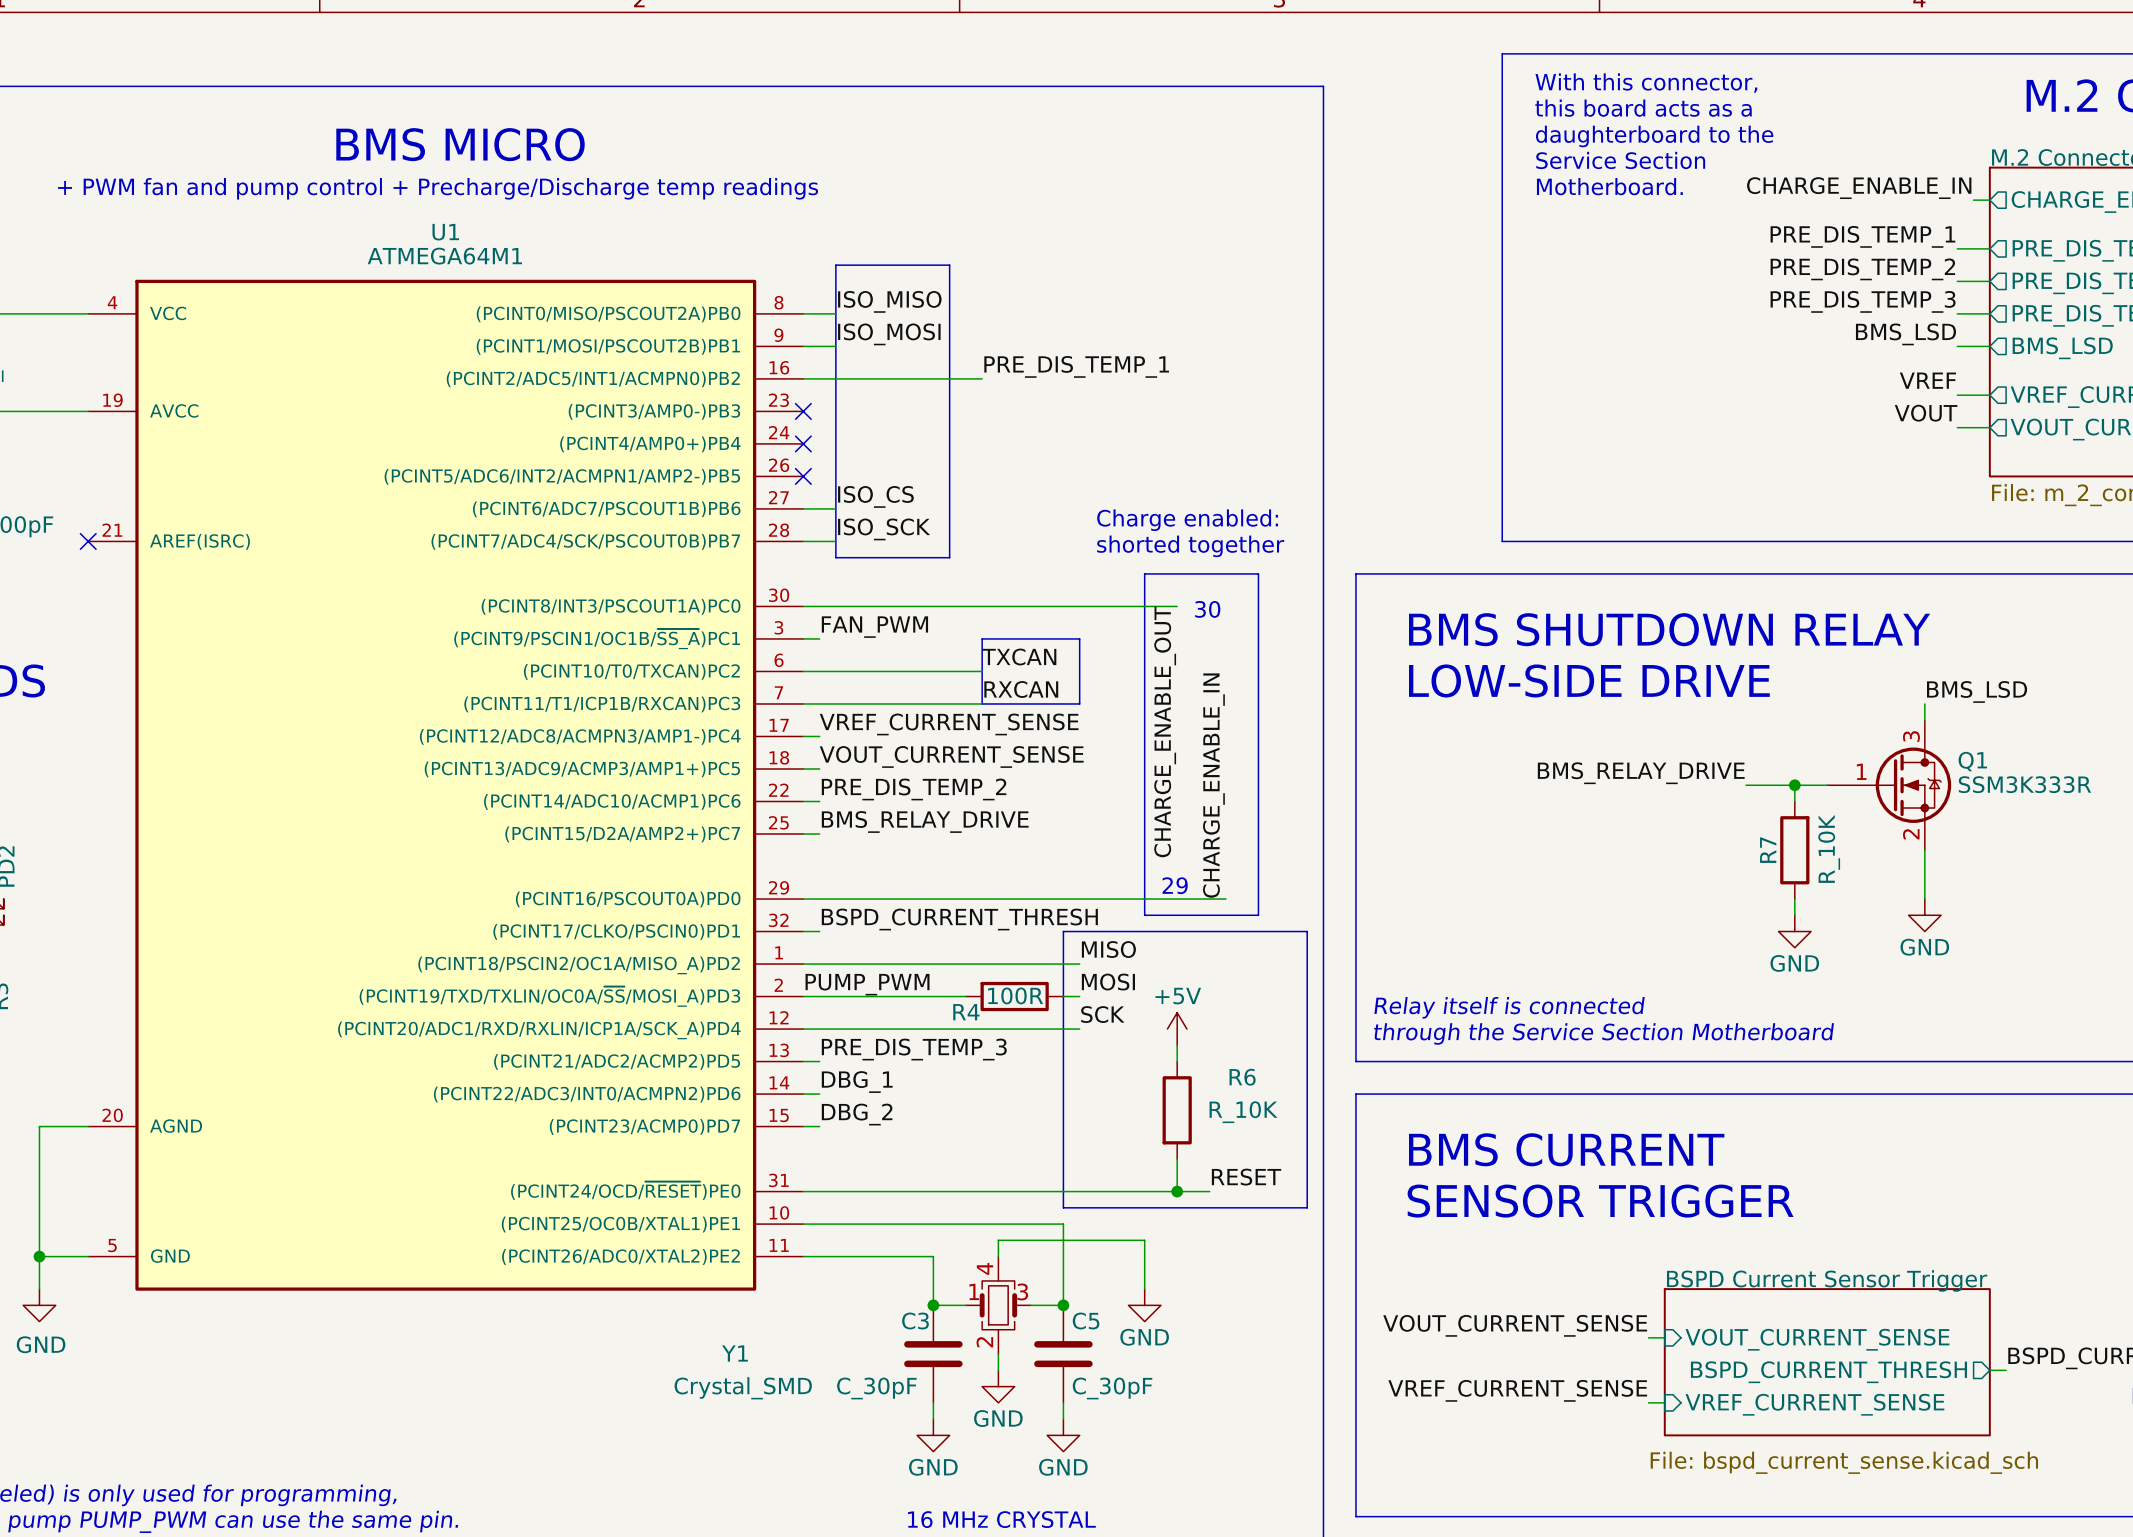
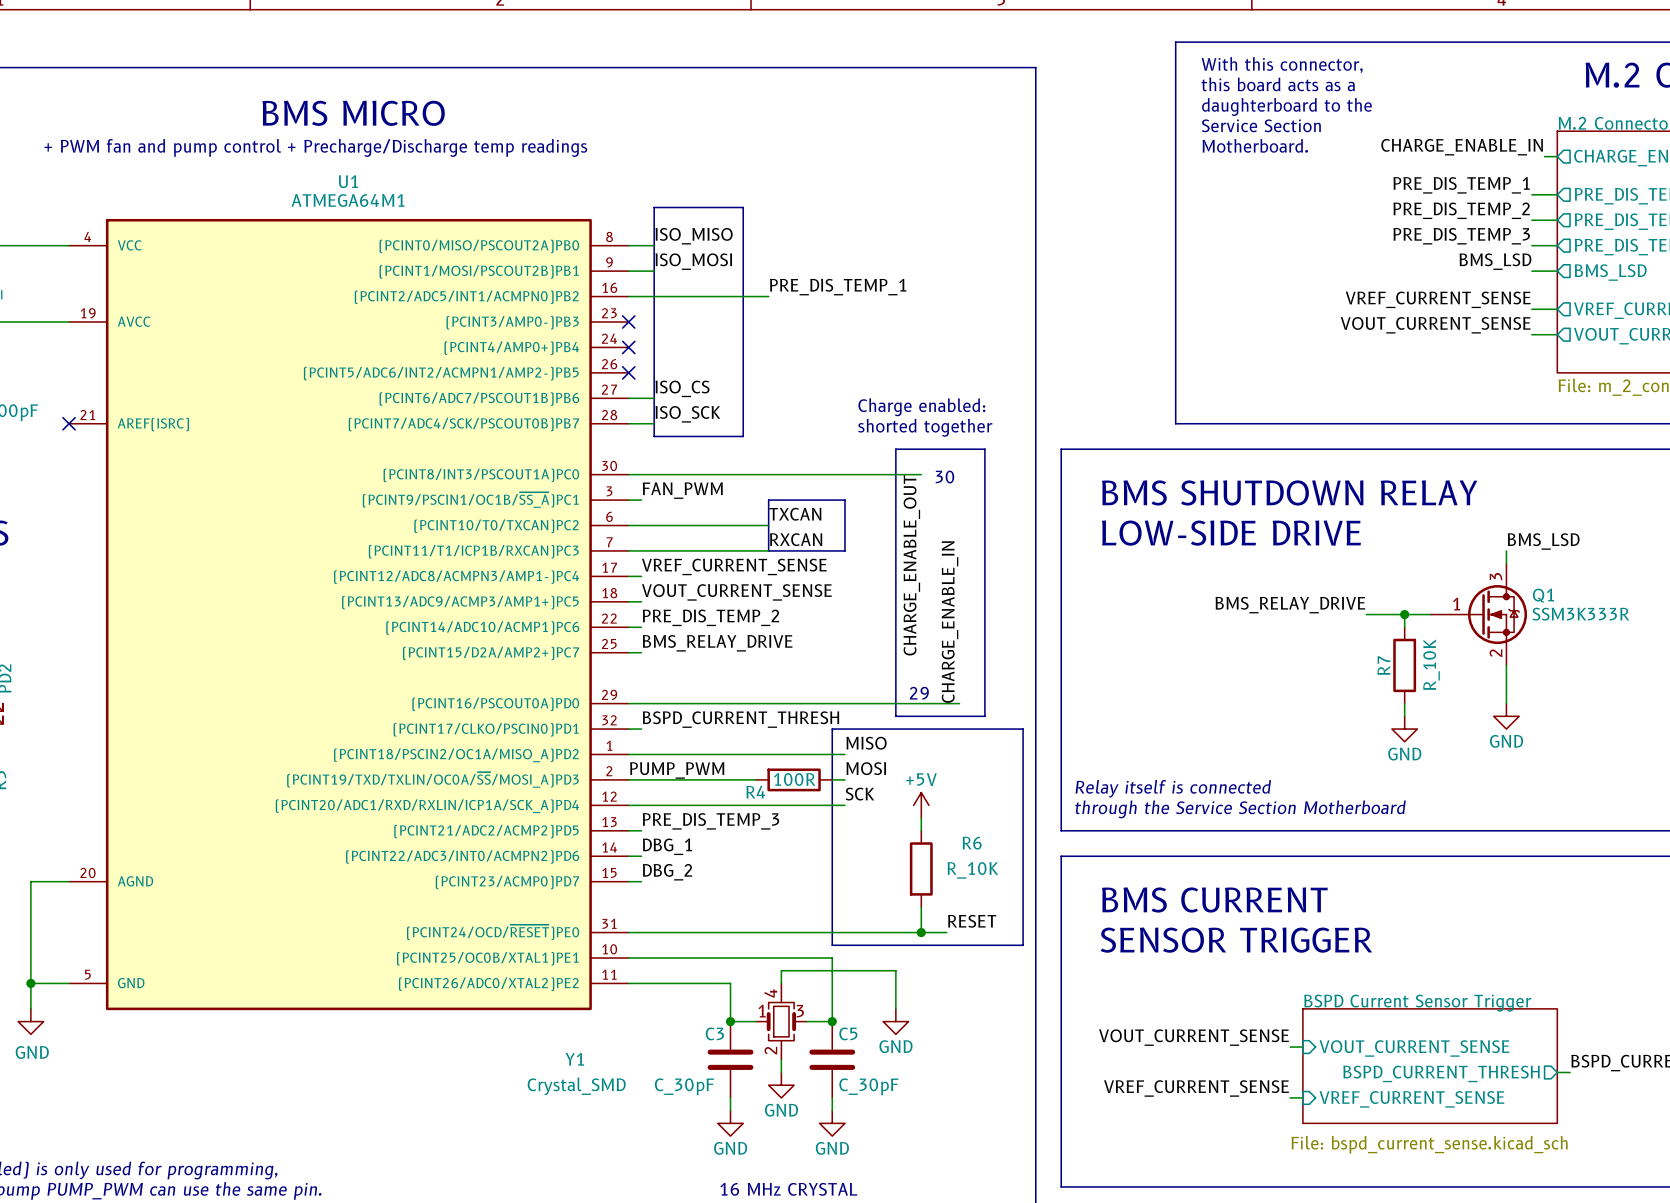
label: VREF (1927, 380) -> VREF_CURRENT_SENSE (1438, 299)
label: VOUT (1926, 413) -> VOUT_CURRENT_SENSE (1435, 325)

